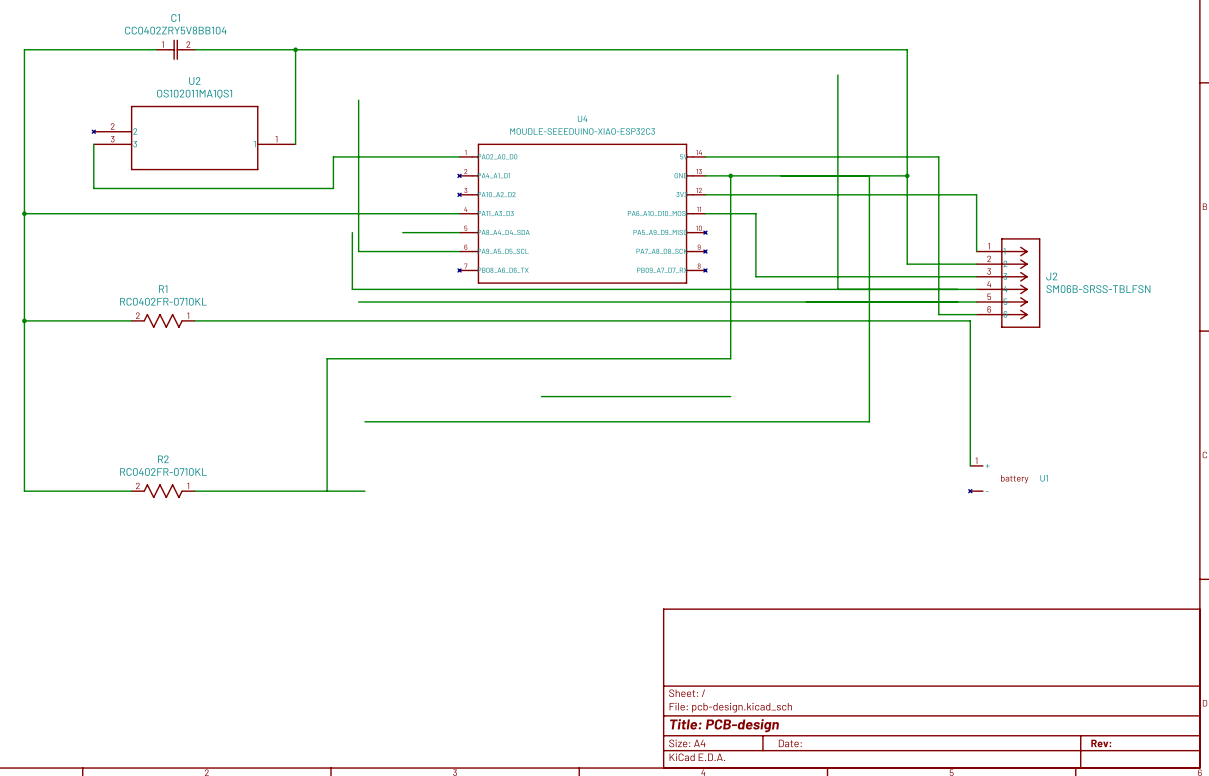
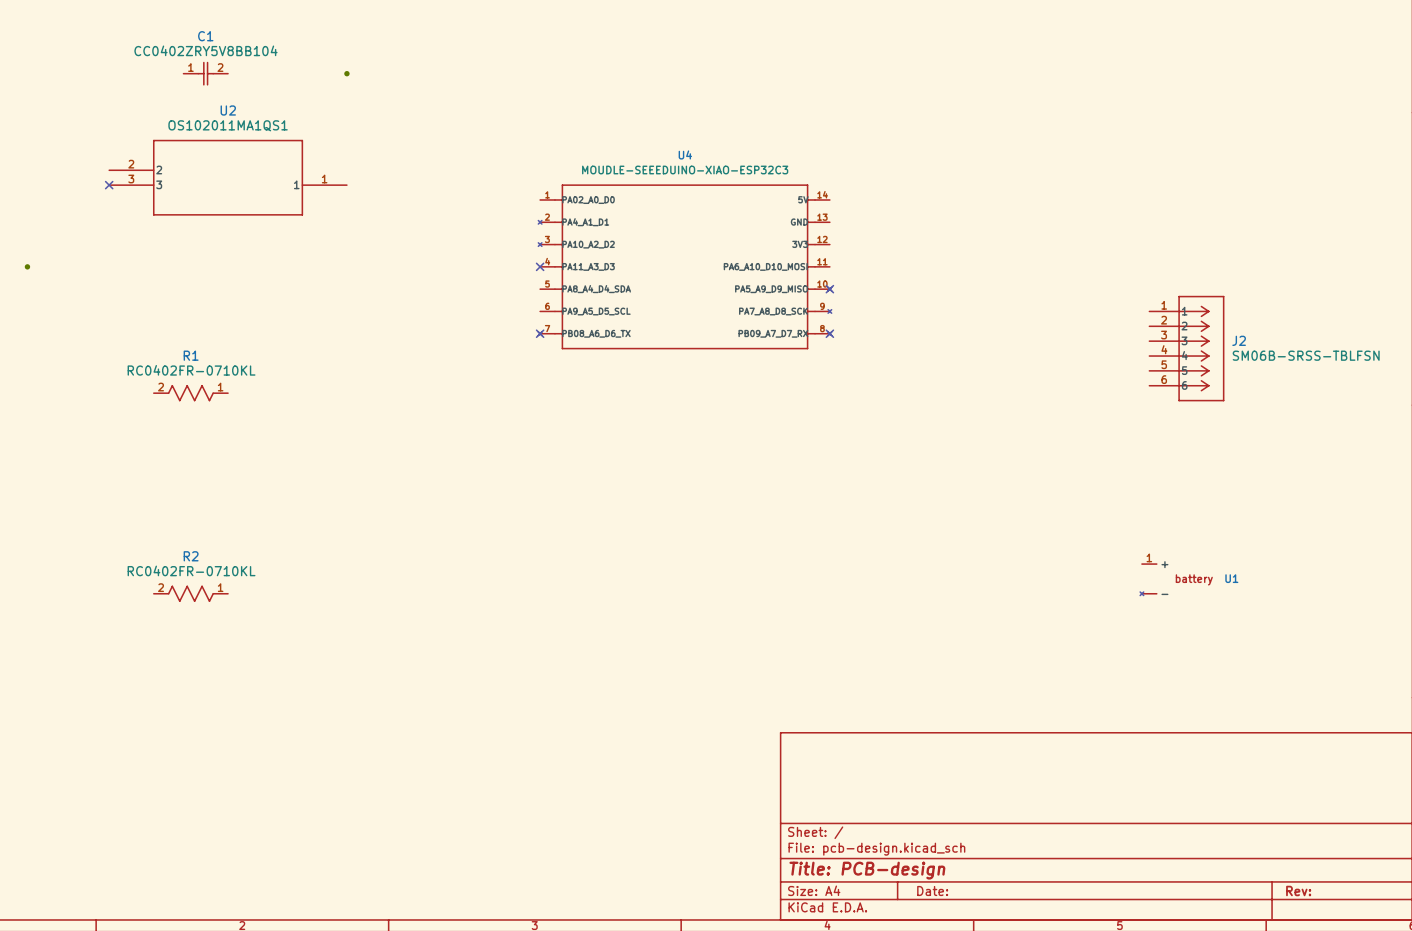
wire: (156, 49) (24, 49) (24, 491) (131, 491) -> none
wire: (194, 49) (907, 49) (907, 264) (976, 264) -> none
wire: (295, 49) (295, 144) -> none
wire: (837, 74) (837, 289) -> none
wire: (358, 100) (358, 251) (459, 251) -> none
U2 symbol: [92, 106, 296, 170] -> [109, 140, 347, 216]
wire: (93, 144) (93, 188) (333, 188) (333, 156) (459, 156) -> none
no-connect mark: none -> (109, 185)
wire: (705, 156) (938, 156) (938, 314) (976, 314) -> none
wire: (705, 175) (907, 175) -> none
wire: (730, 175) (730, 358) (327, 358) (327, 491) -> none
junction: (730, 175) -> none
wire: (869, 175) (869, 421) (364, 421) -> none
junction: (907, 175) -> none
wire: (705, 194) (976, 194) (976, 251) -> none
wire: (24, 213) (459, 213) -> none
no-connect mark: none -> (540, 266)
wire: (705, 213) (755, 213) (755, 276) (976, 276) -> none
wire: (352, 232) (352, 289) (976, 289) -> none
wire: (402, 232) (459, 232) -> none
no-connect mark: none -> (829, 289)
no-connect mark: none -> (540, 333)
no-connect mark: none -> (829, 333)
wire: (358, 301) (976, 301) -> none
wire: (24, 320) (131, 320) -> none
junction: (24, 320) -> none
wire: (194, 320) (970, 320) (970, 465) -> none
wire: (541, 396) (730, 396) -> none
wire: (194, 491) (364, 491) -> none

